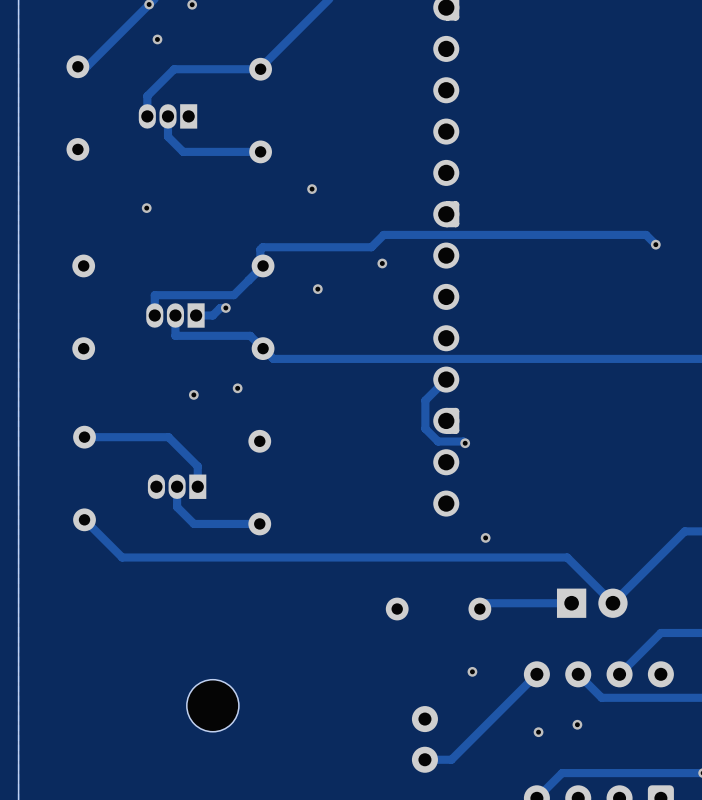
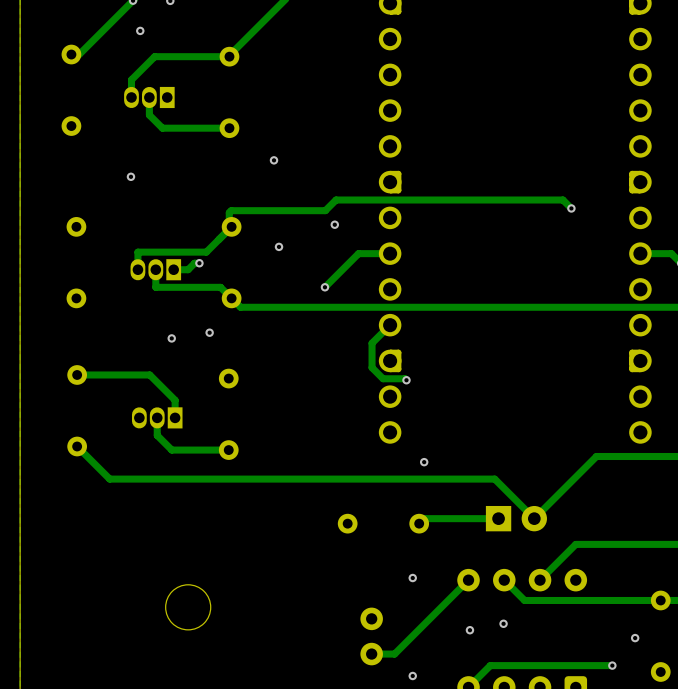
track: none -> (390, 253) (358, 253) (324, 287)
via: none -> (324, 287)
via: none -> (412, 675)

